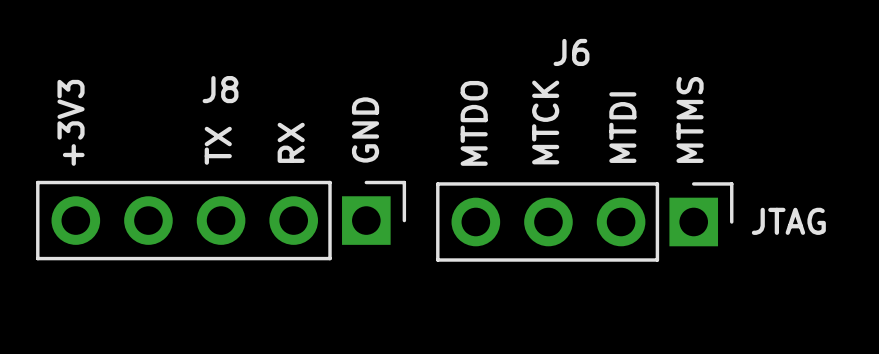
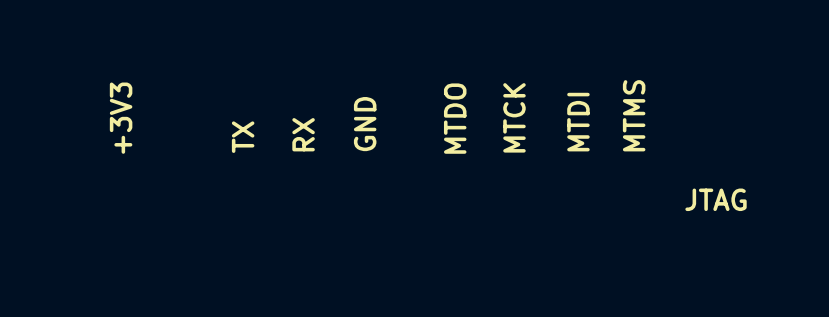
J8: (221, 220) -> none
J6: (584, 221) -> none

